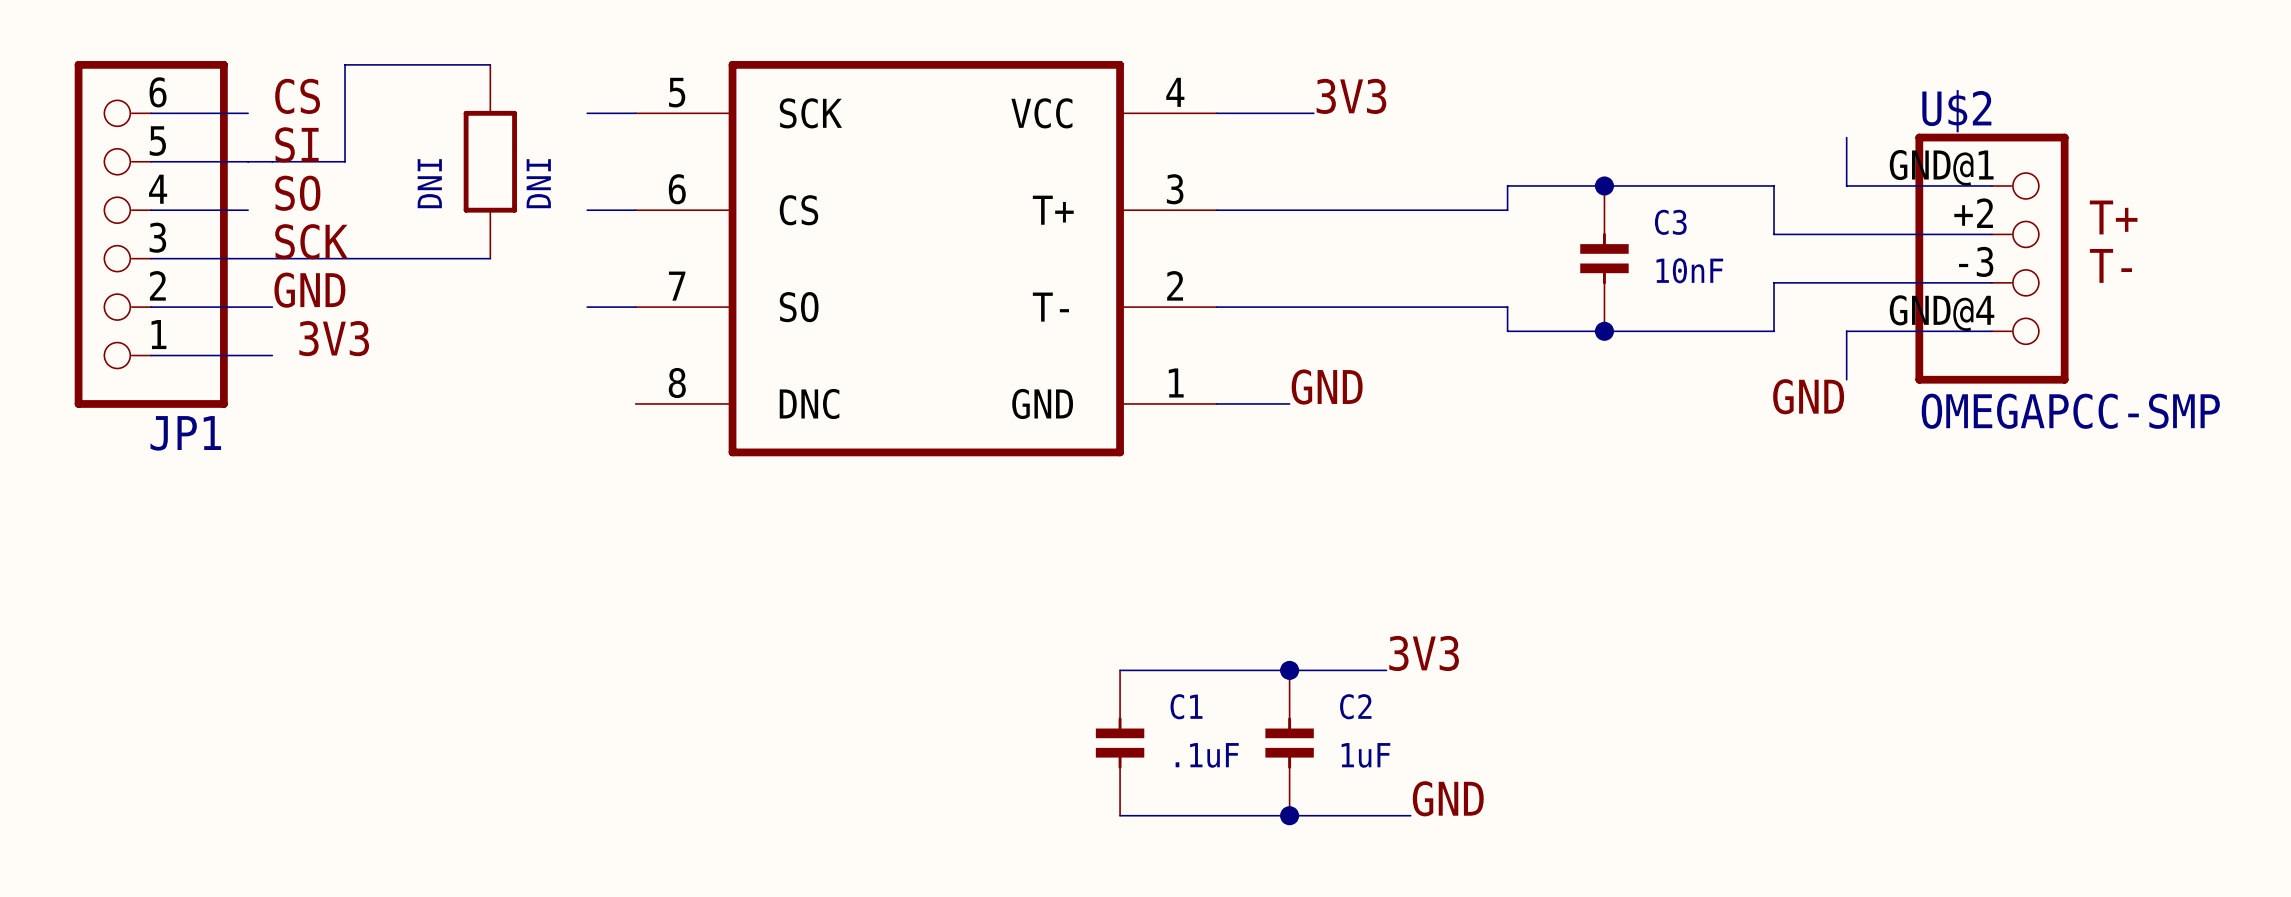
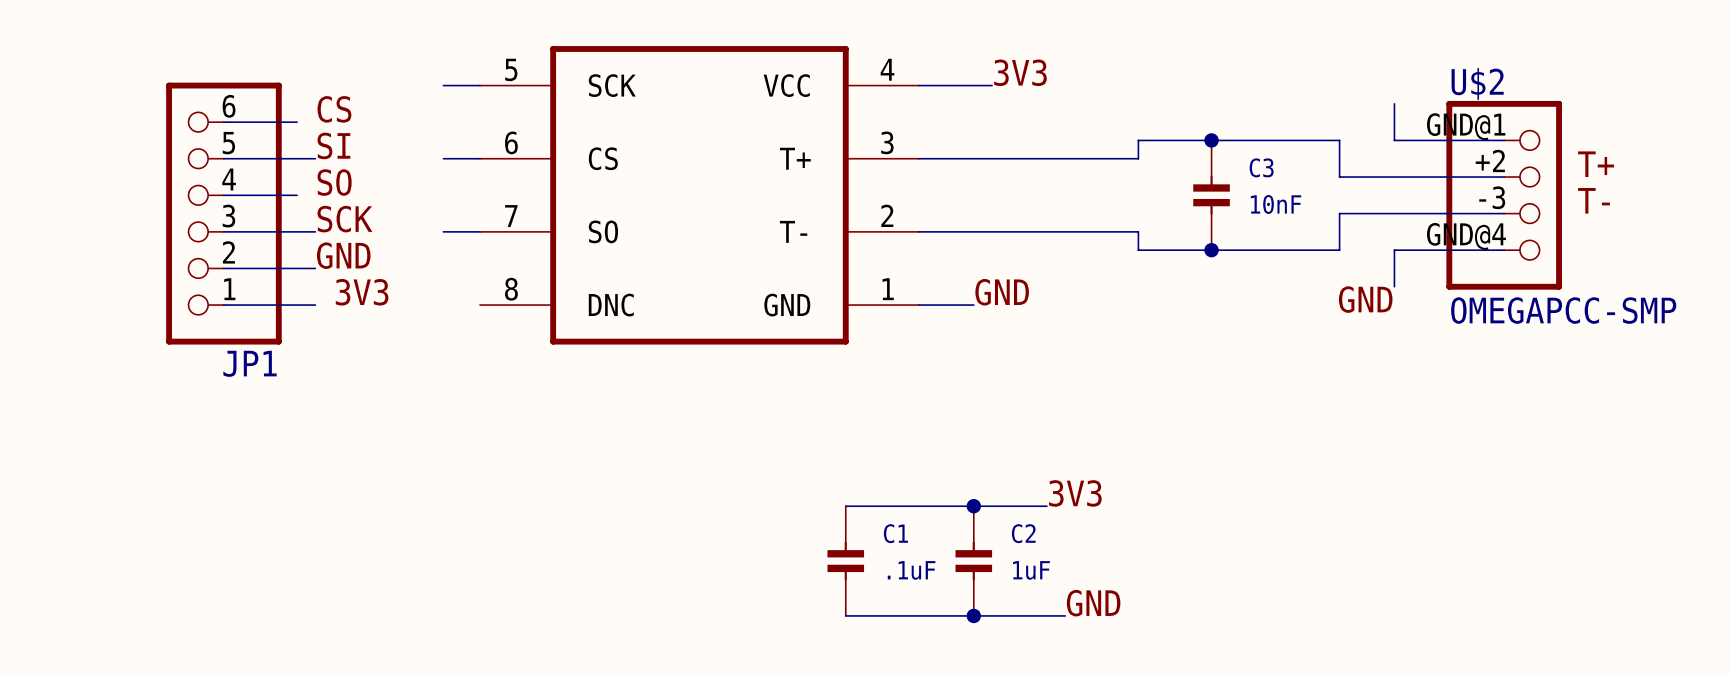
wire: (490, 64) (345, 64) (345, 161) -> (297, 122) (260, 122)
label position: CS (297, 96) -> CS (334, 109)
wire: (151, 113) (248, 113) -> none
label position: SI (296, 144) -> SI (333, 145)
wire: (151, 161) (296, 161) -> none
DNI: DNI (490, 161) -> none
label position: SO (297, 193) -> SO (334, 182)
wire: (151, 210) (248, 210) -> none
wire: none -> (223, 158) (315, 158)
JP1 position: (151, 234) -> (223, 213)
label position: SCK (311, 241) -> SCK (344, 219)
wire: (151, 258) (296, 258) -> none
wire: (393, 258) (490, 258) -> none
label position: GND (309, 290) -> GND (343, 255)
wire: (151, 307) (272, 307) -> (223, 231) (315, 231)
label position: 3V3 (334, 338) -> 3V3 (362, 292)
wire: (151, 355) (272, 355) -> (223, 268) (315, 268)
wire: none -> (223, 305) (315, 305)

